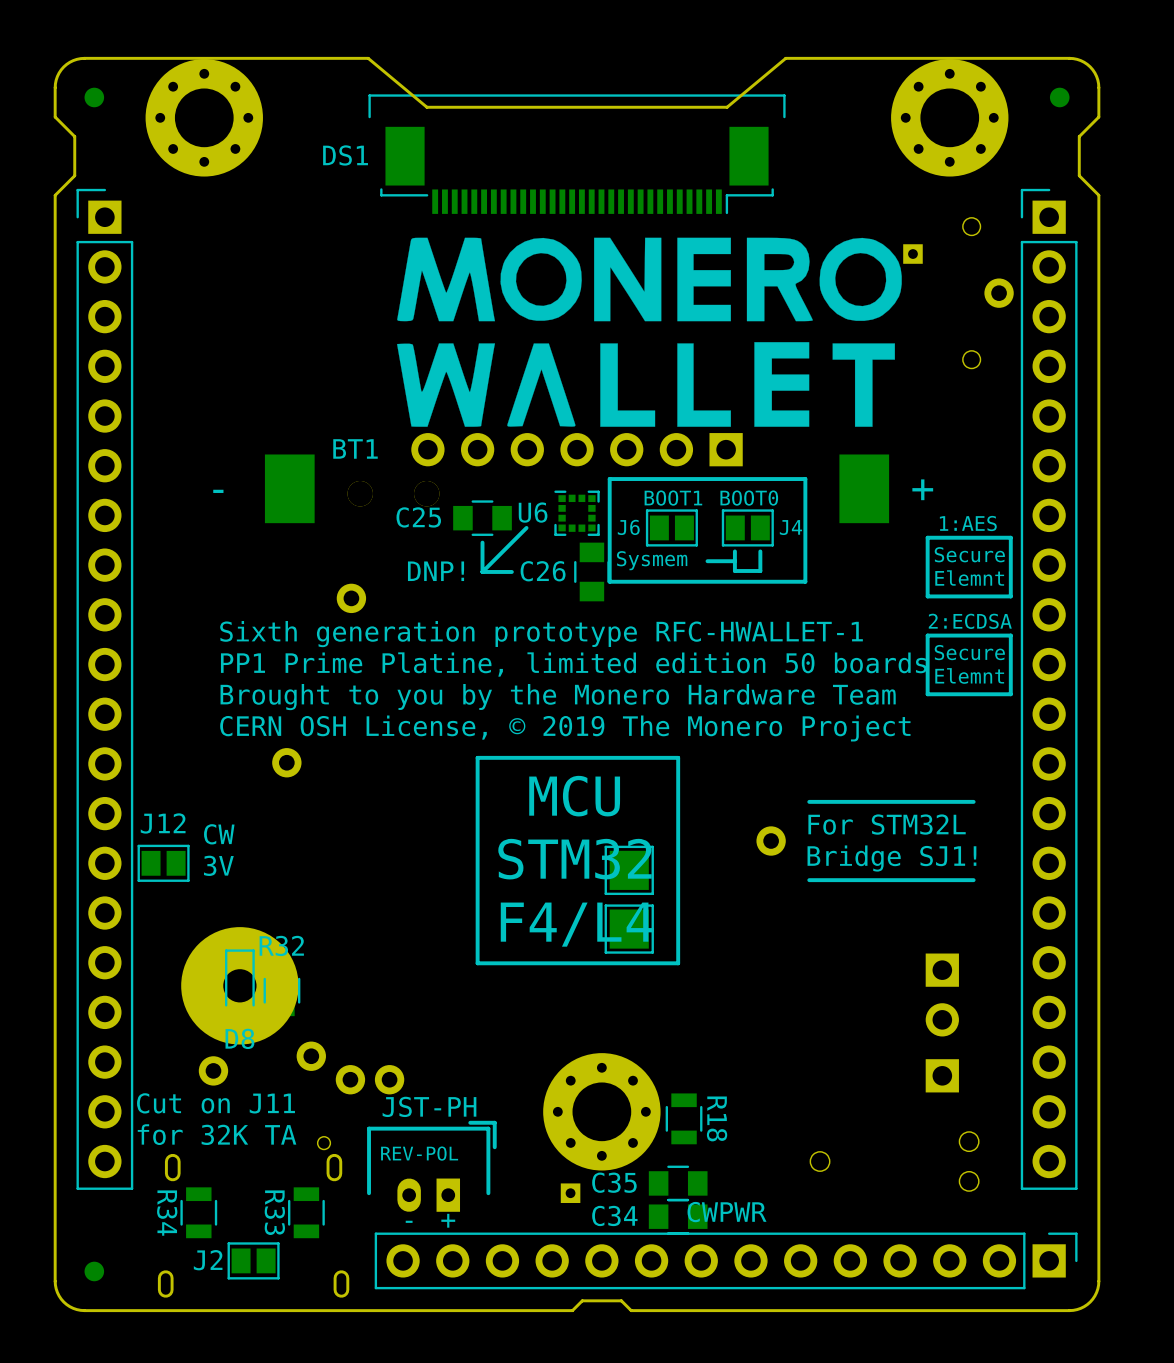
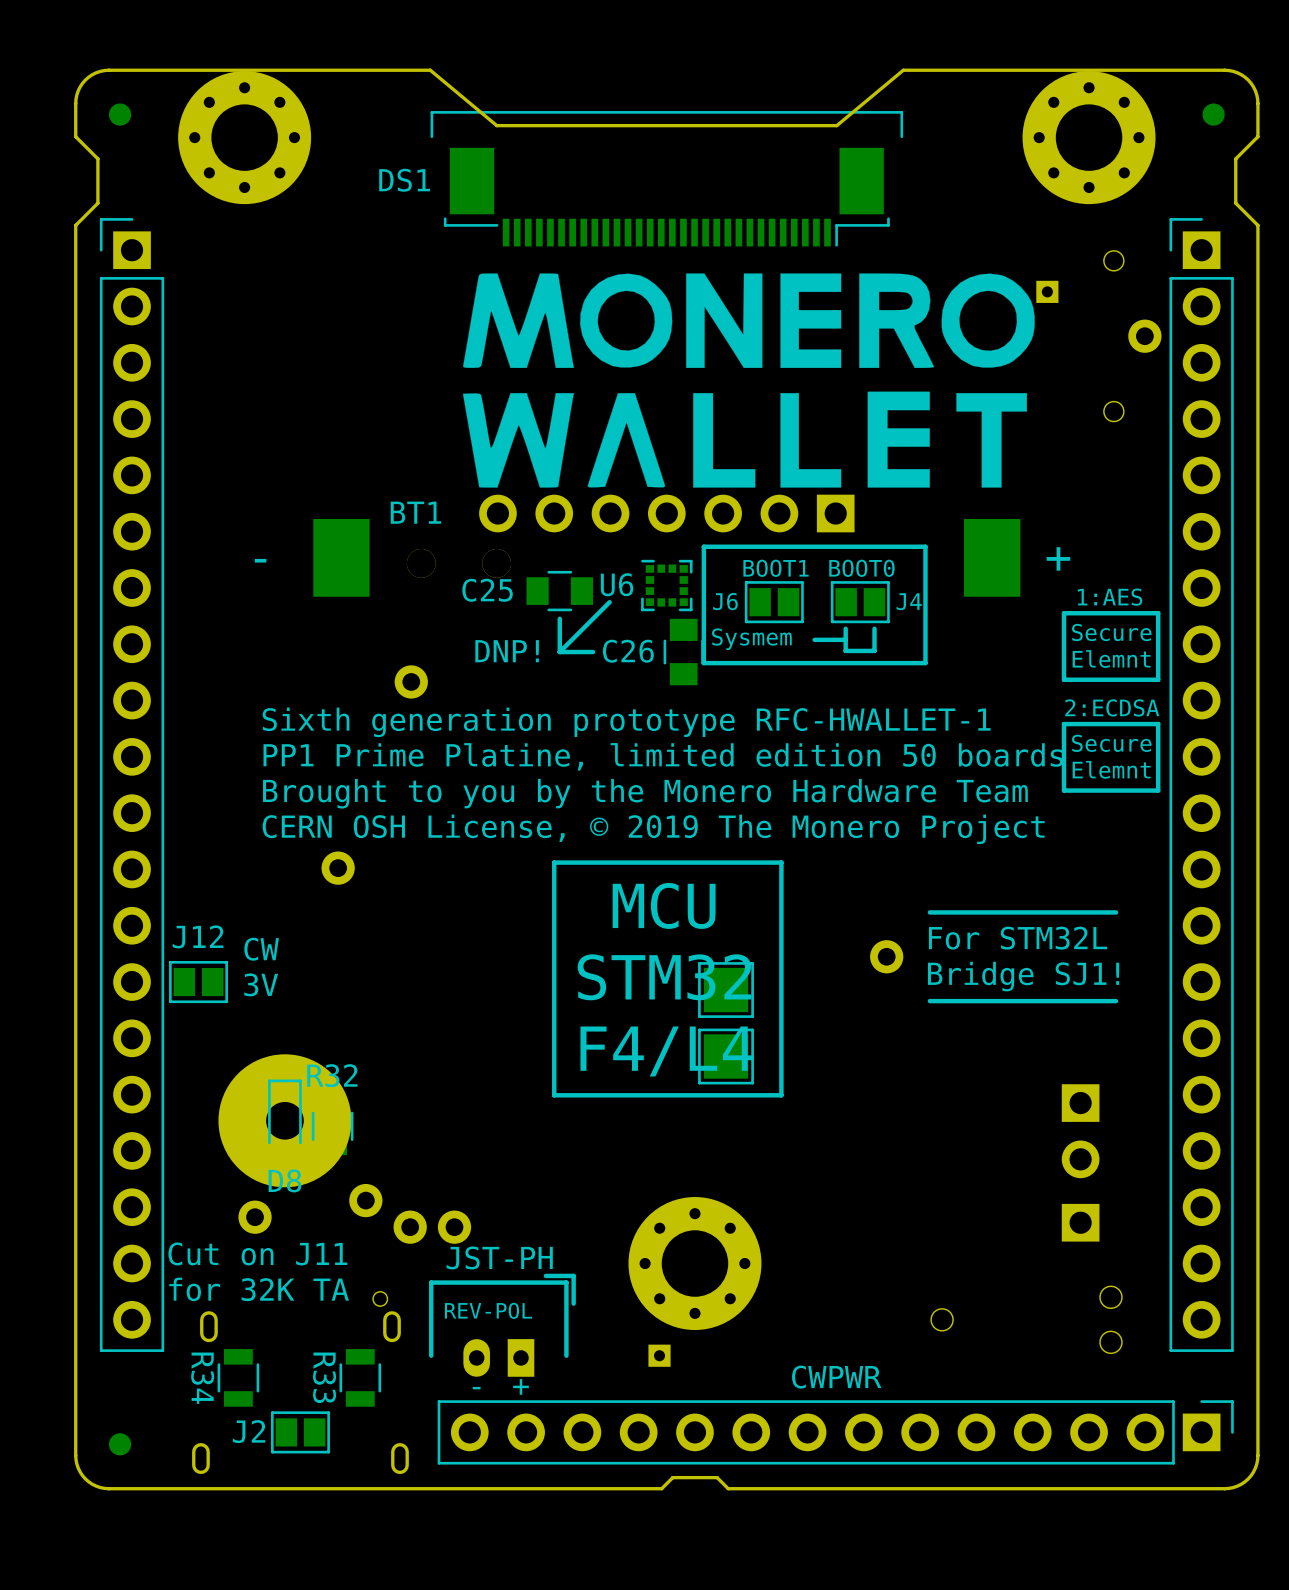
R18: (684, 1118) -> none
C35: (678, 1183) -> none
C34: (678, 1216) -> none

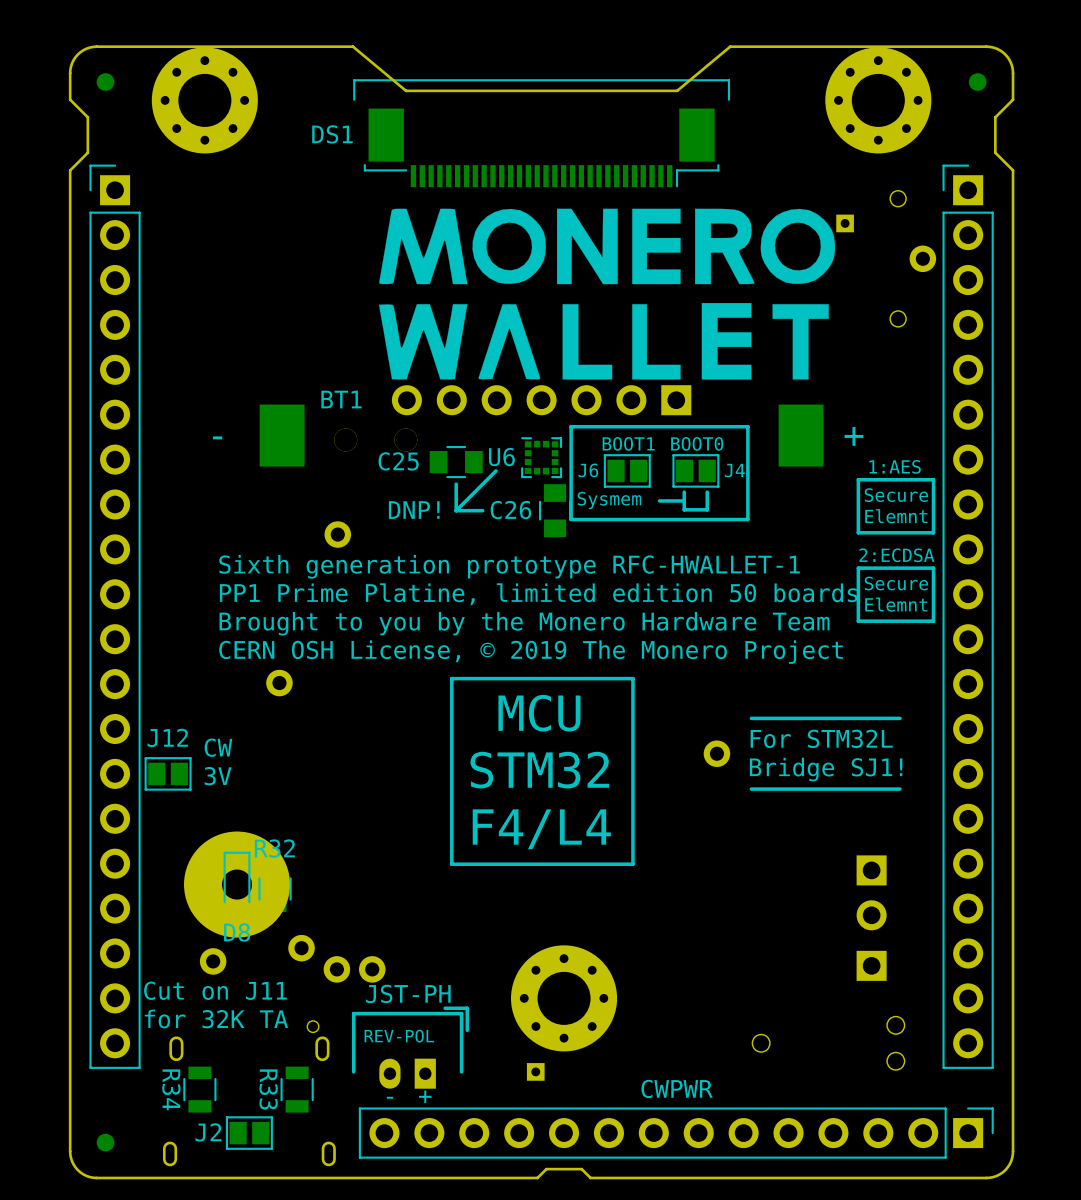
part: (726, 990) -> none
part: (726, 1056) -> none

